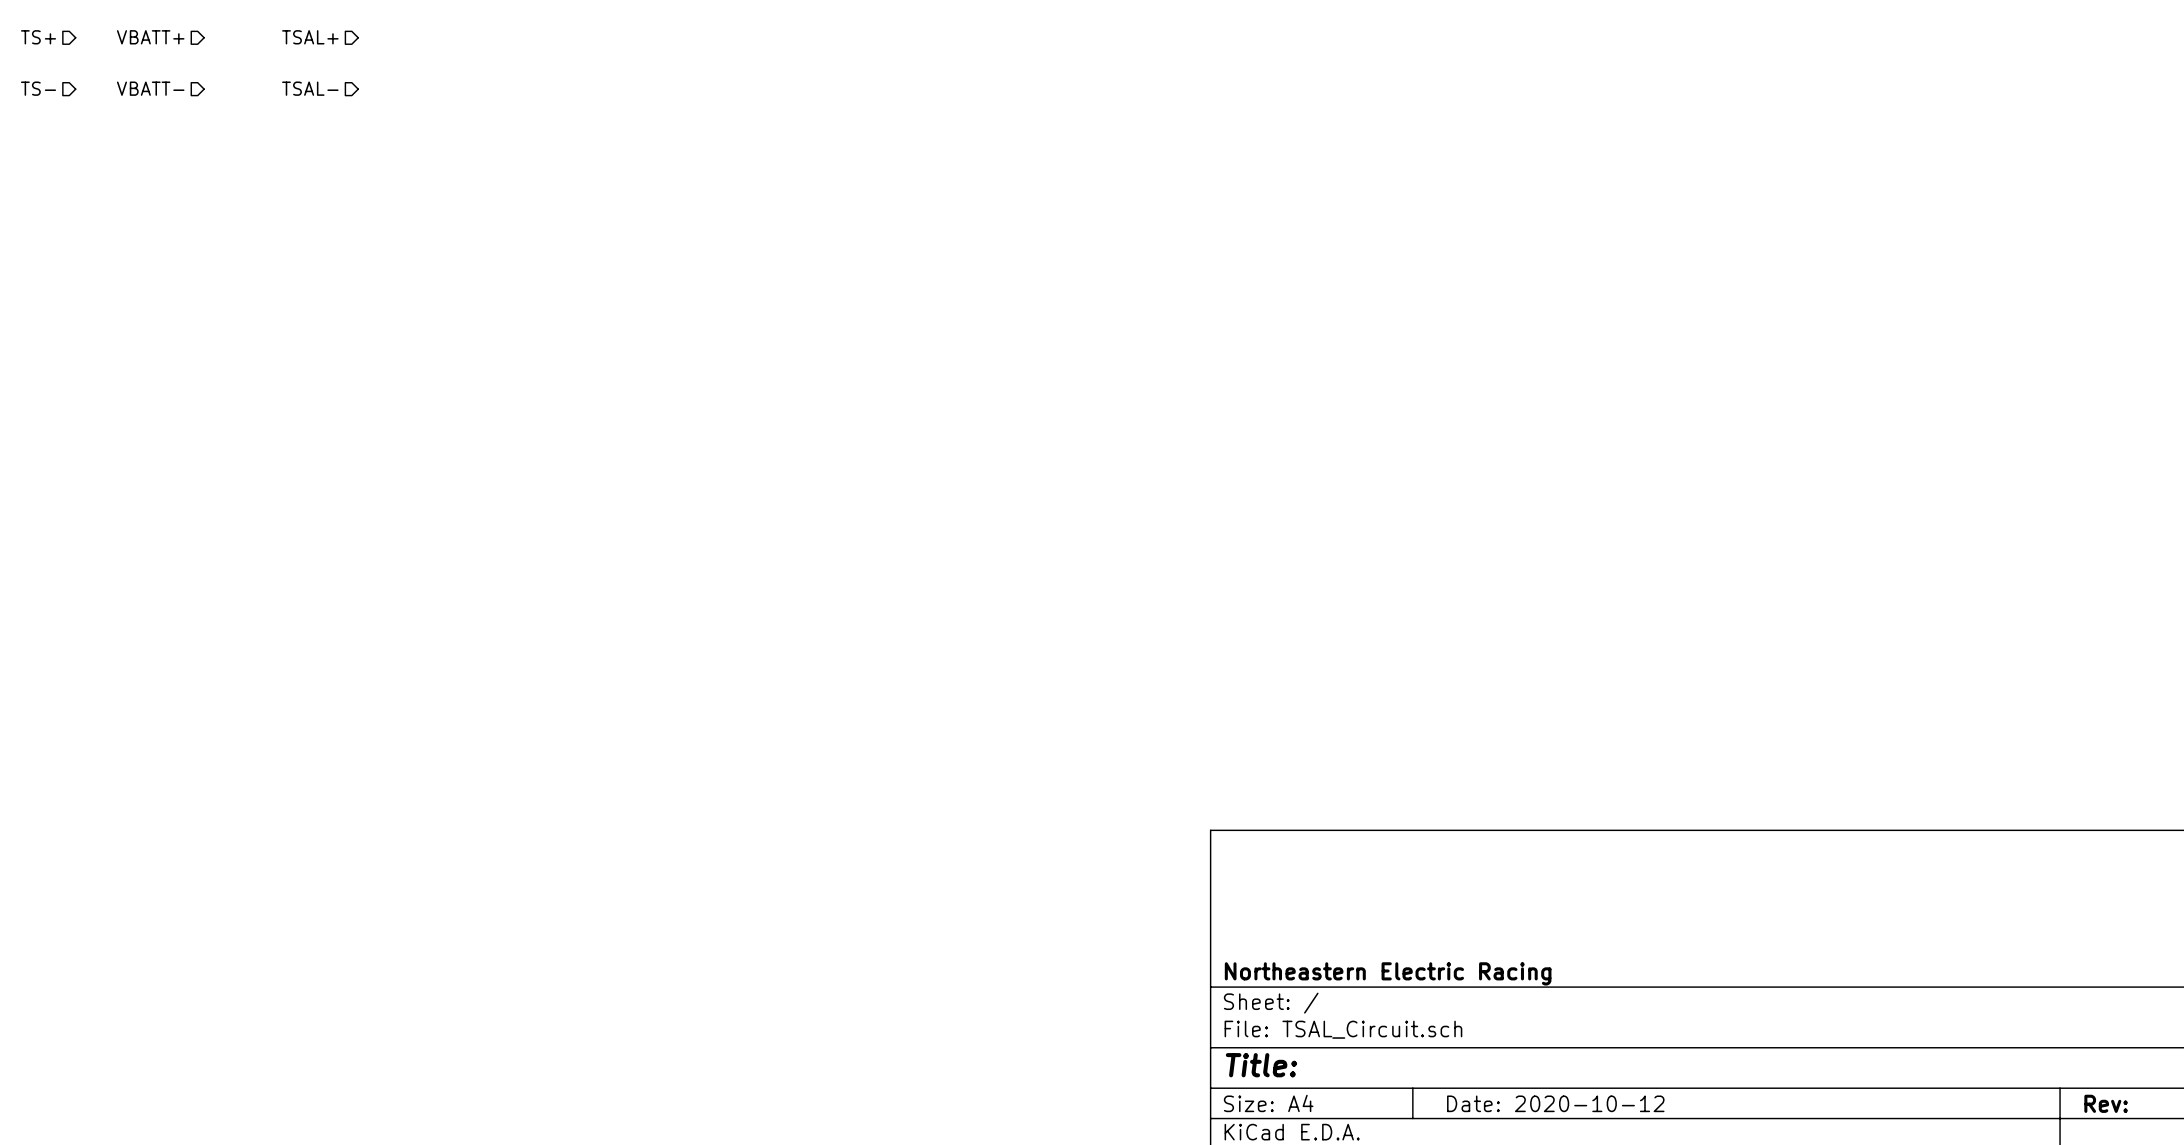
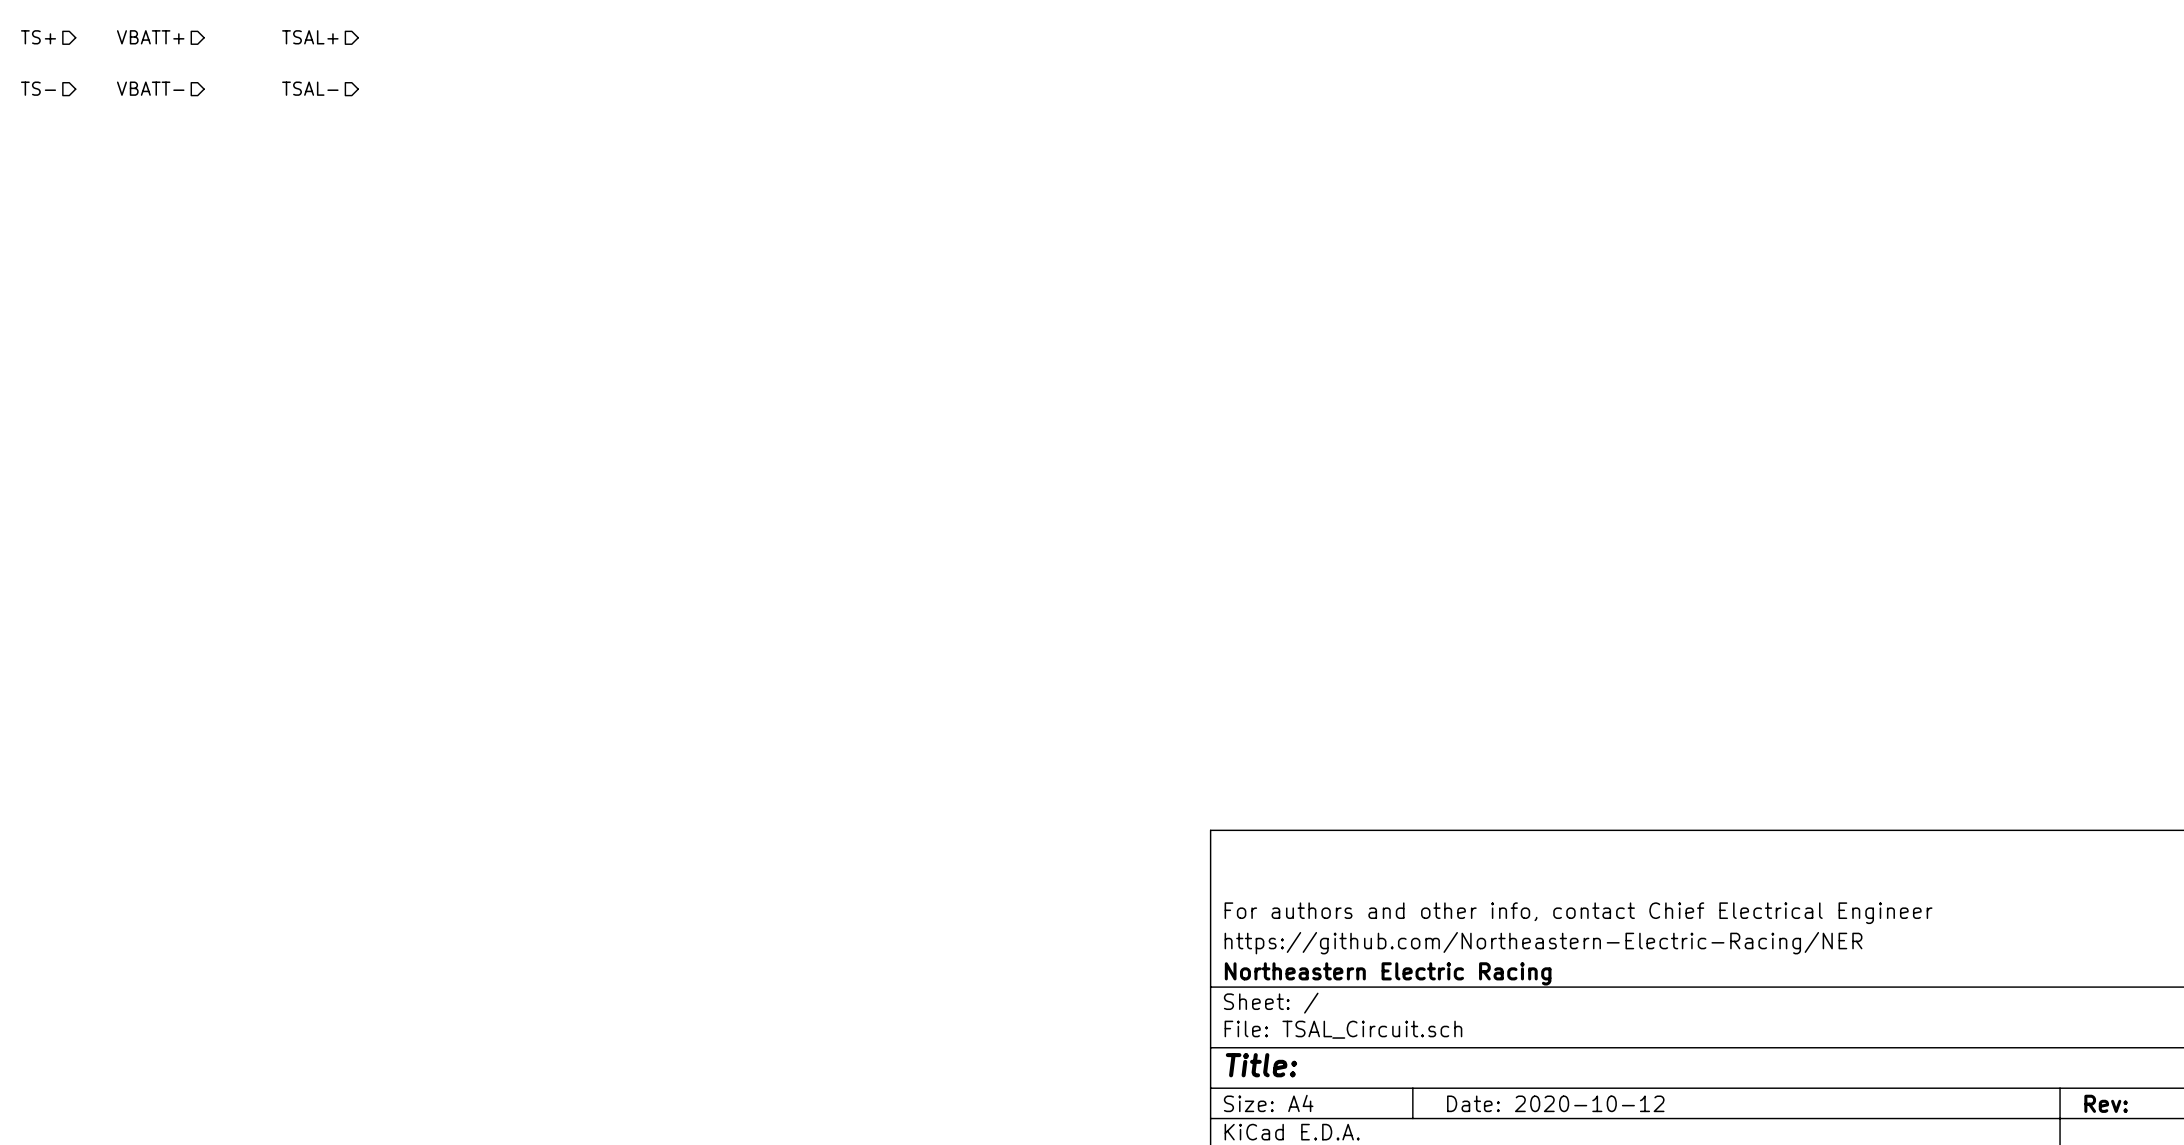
title block: none -> For authors and other info, contact Chief Electrical Engineer (1578, 913)
title block: none -> https://github.com/Northeastern-Electric-Racing/NER (1543, 943)

